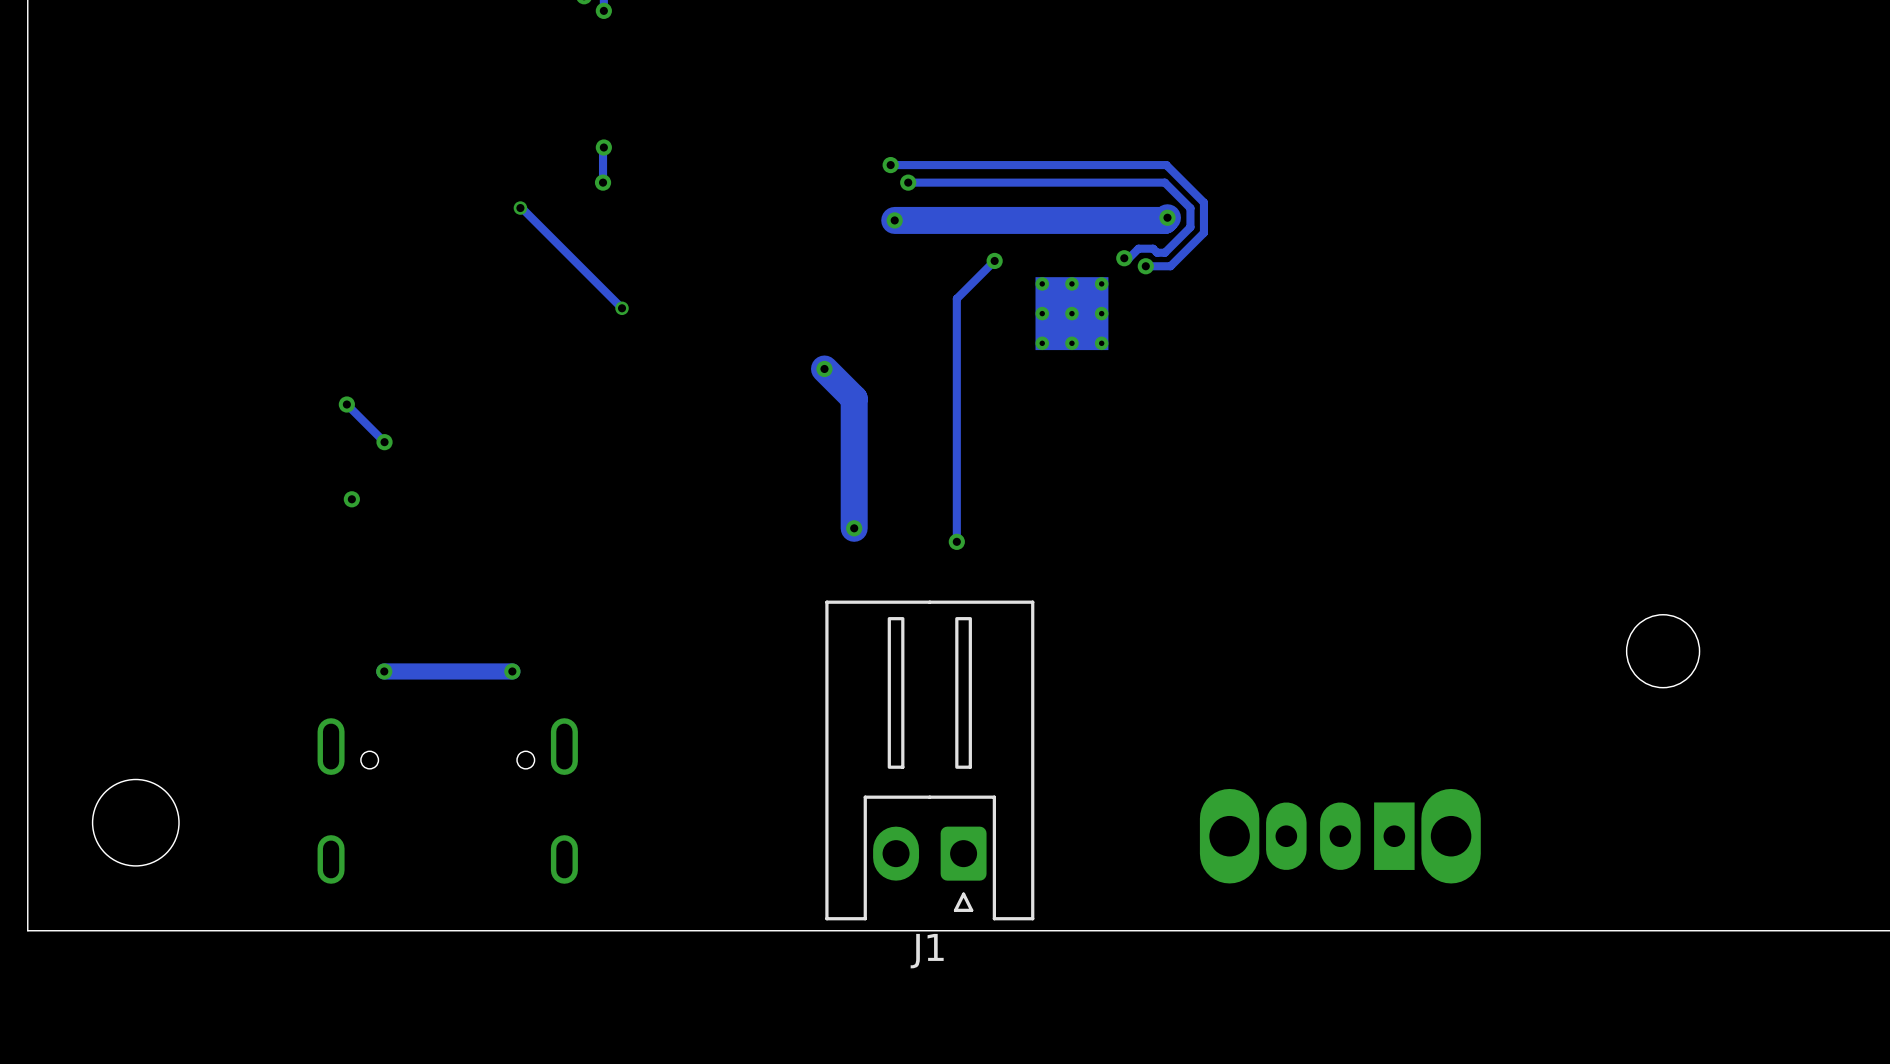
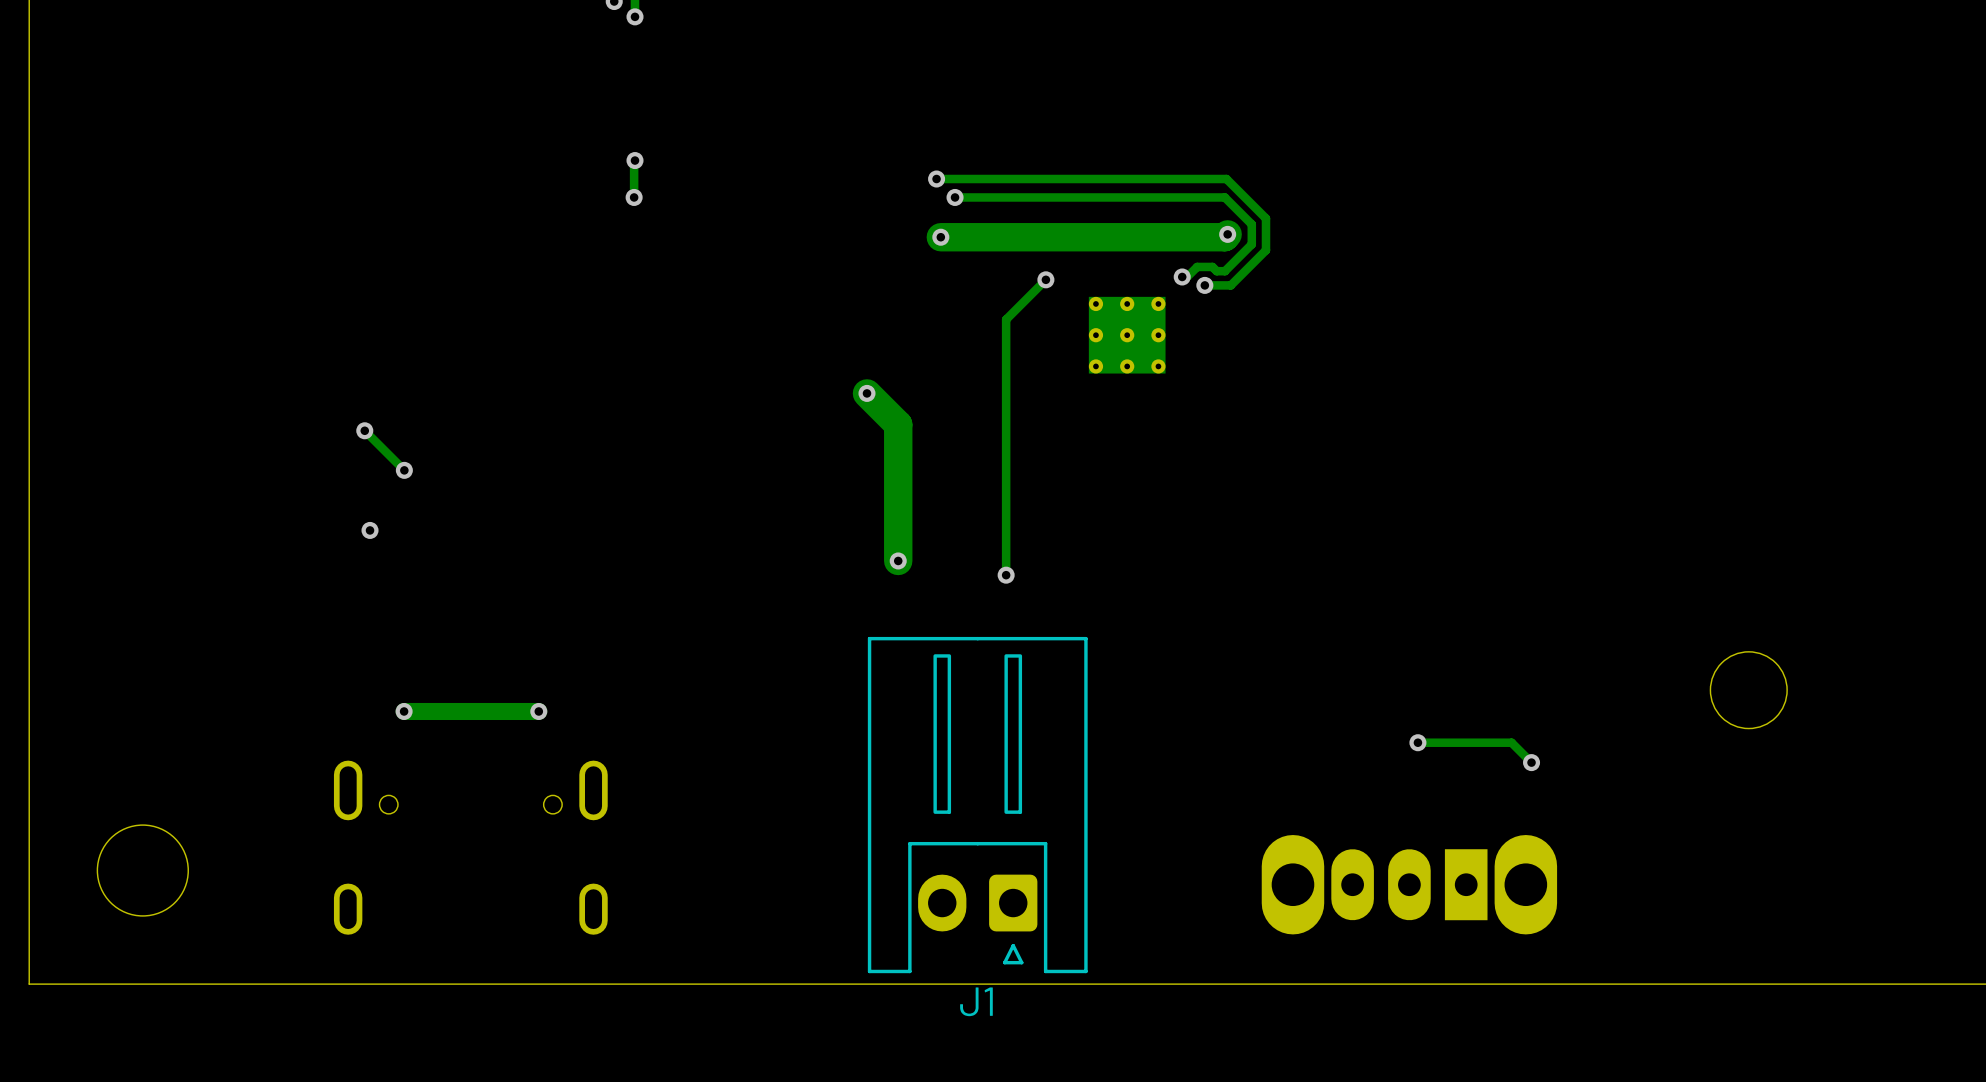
track: (520, 208) (622, 308) -> none
via: (520, 208) -> none
via: (622, 308) -> none
track: none -> (1417, 742) (1511, 742) (1531, 762)
via: none -> (1417, 742)
via: none -> (1531, 762)

